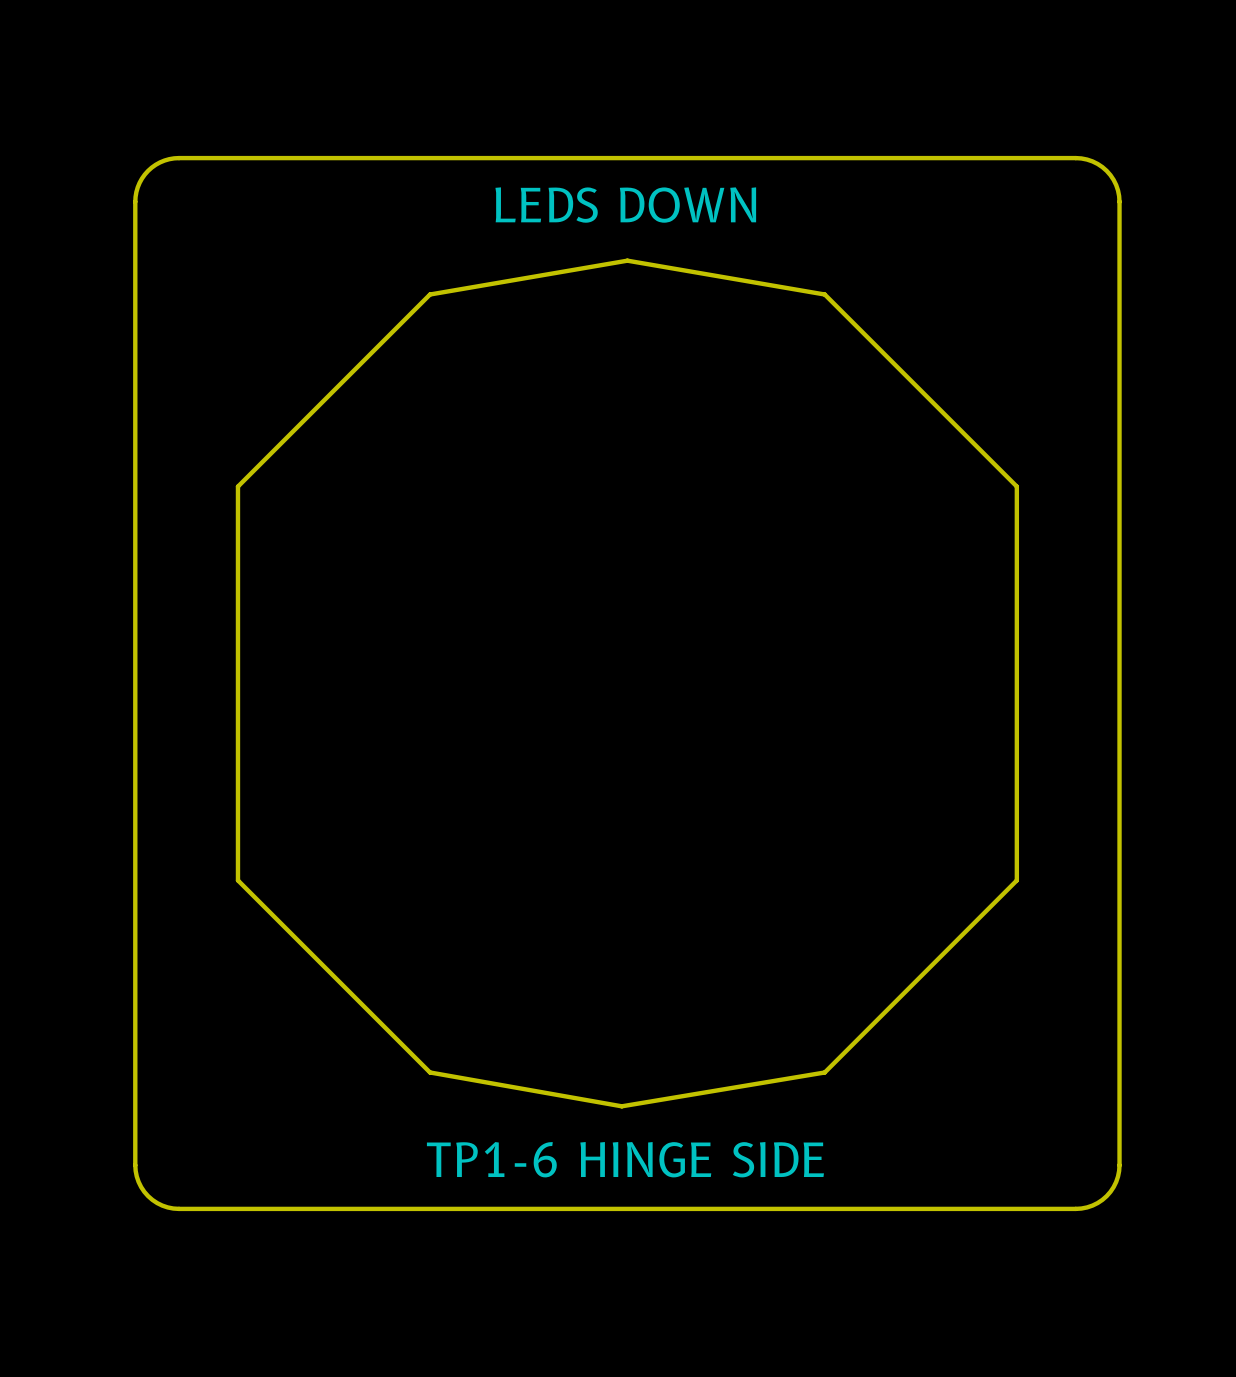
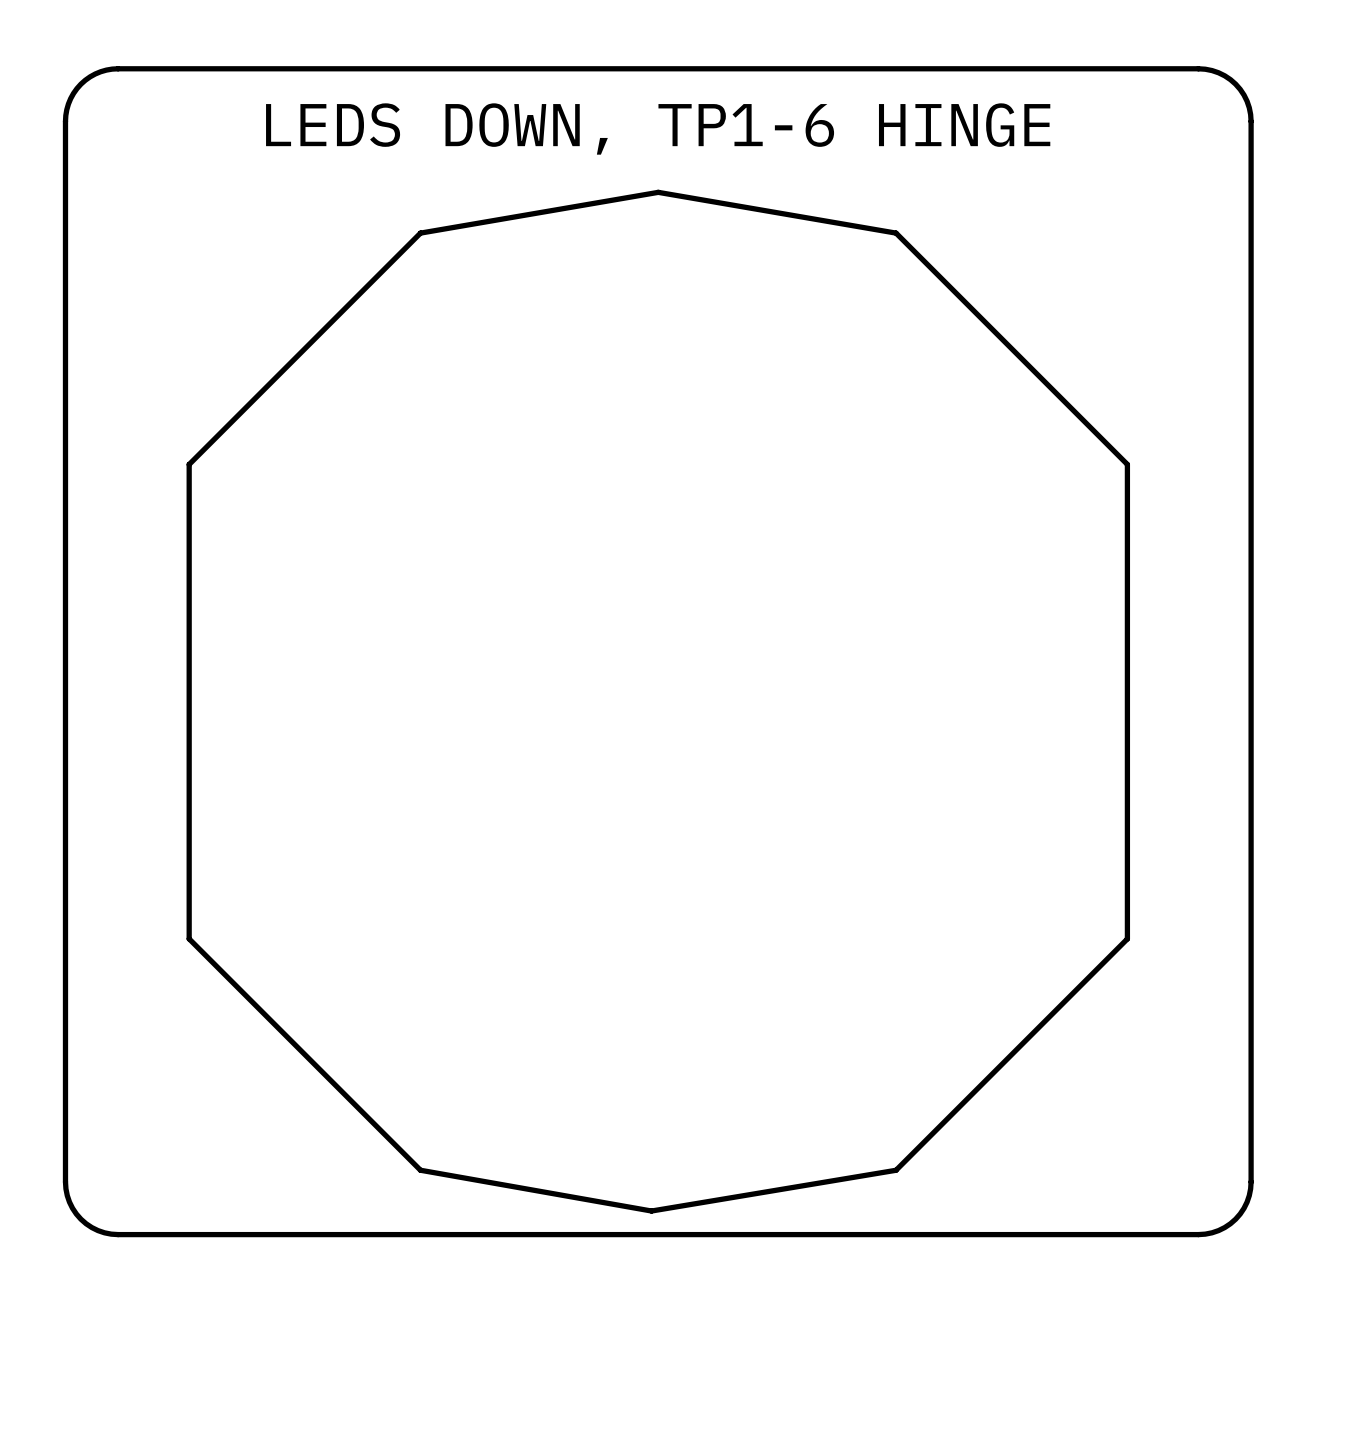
text: LEDS DOWN (625, 205) -> LEDS DOWN, TP1-6 HINGE (658, 128)
board edge: (135, 1082) (135, 1165) (138, 1181) (144, 1191) (157, 1203) (178, 1208) (1081, 1208) (1102, 1199) (1113, 1187) (1118, 1176) (1119, 1082) -> (65, 1181) (69, 1202) (80, 1219) (97, 1230) (118, 1234) (1198, 1234) (1218, 1230) (1235, 1219) (1247, 1202) (1251, 1181)
text: TP1-6 HINGE SIDE (625, 1159) -> none

